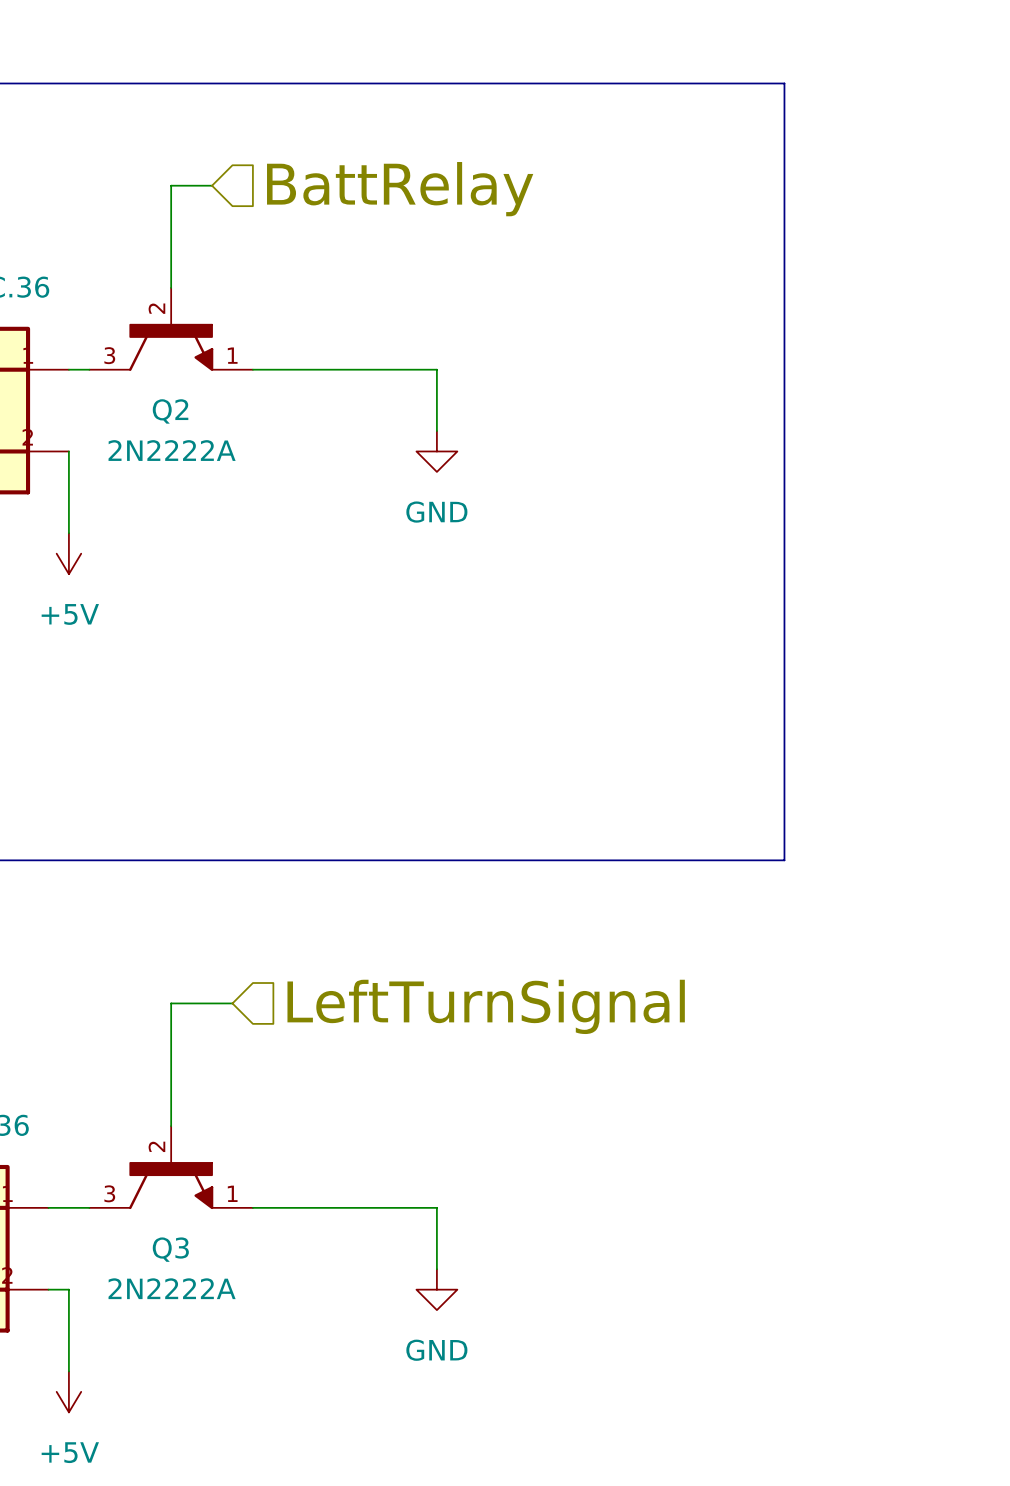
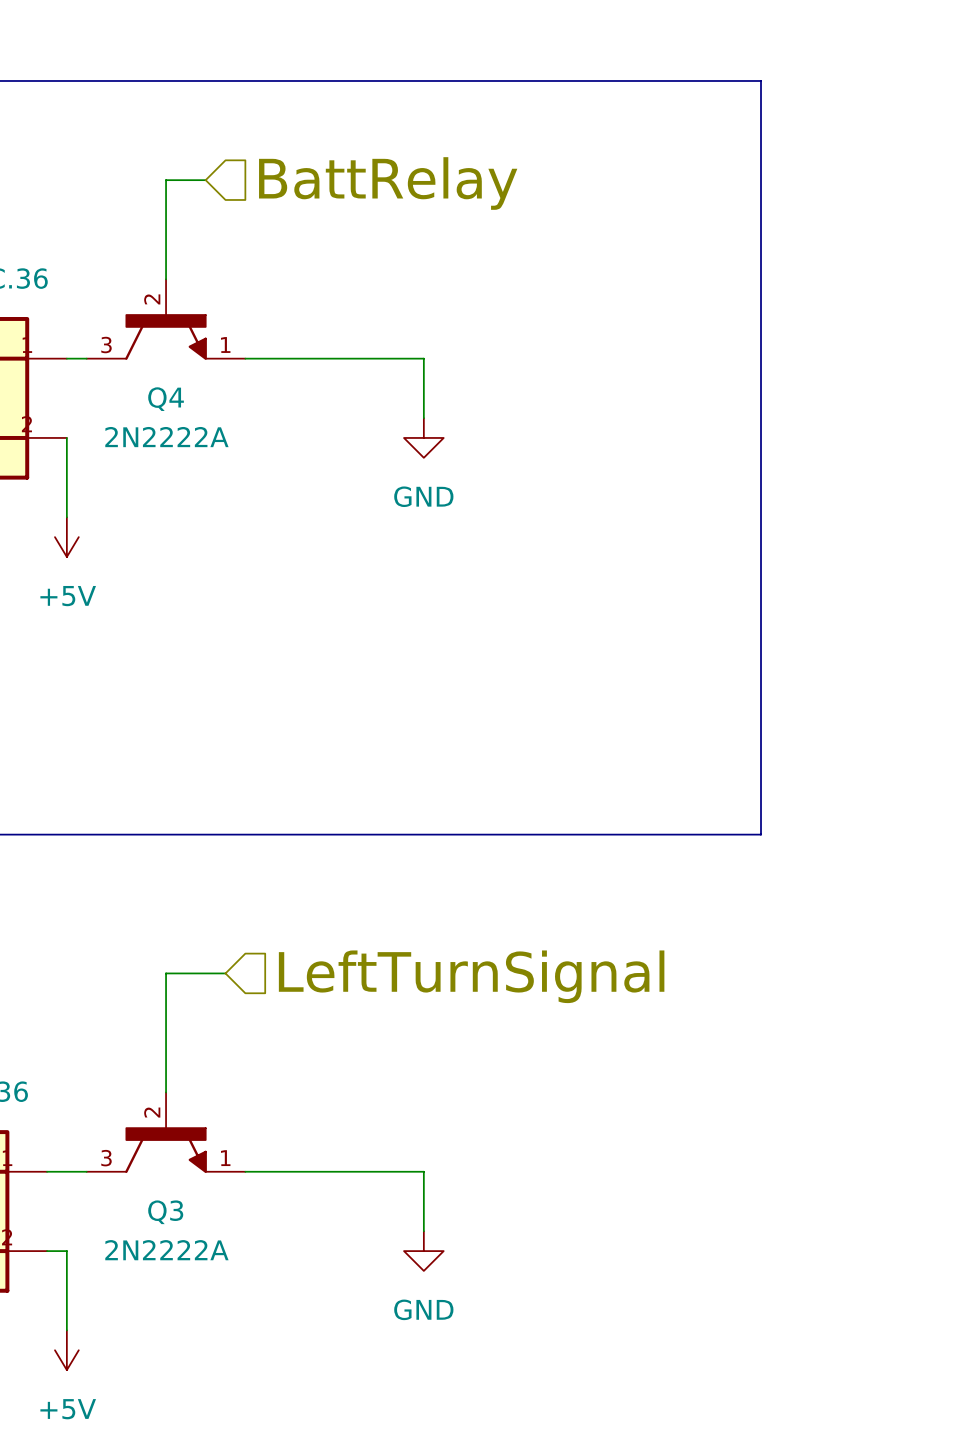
Q2 name: Q2 (170, 411) -> Q4 (166, 399)

